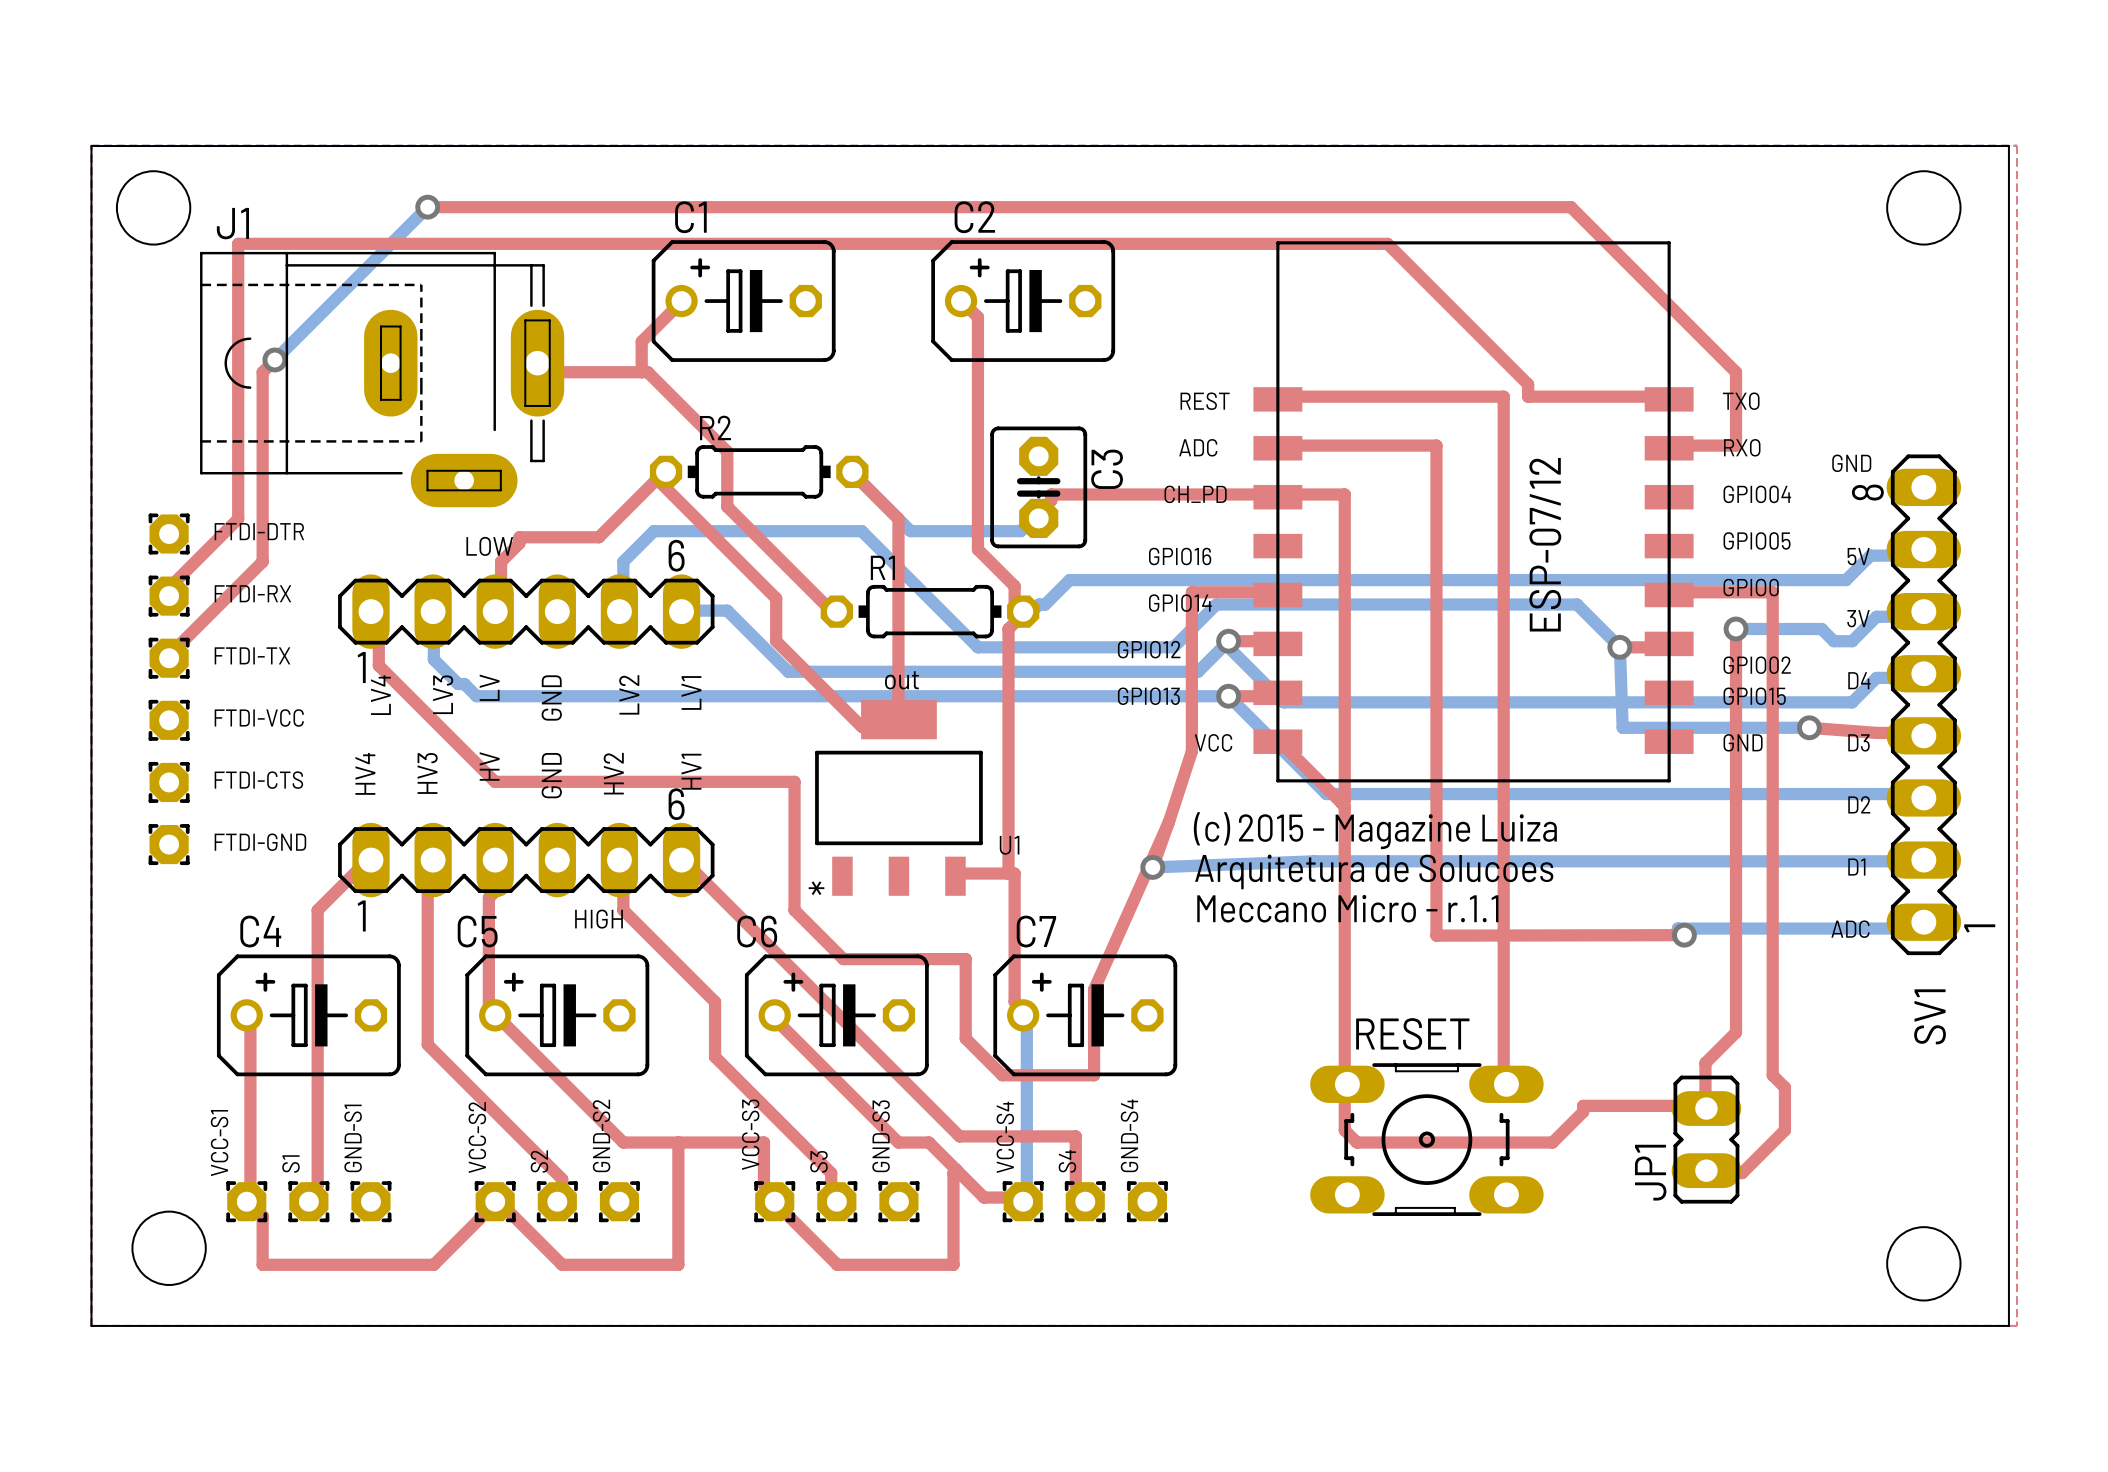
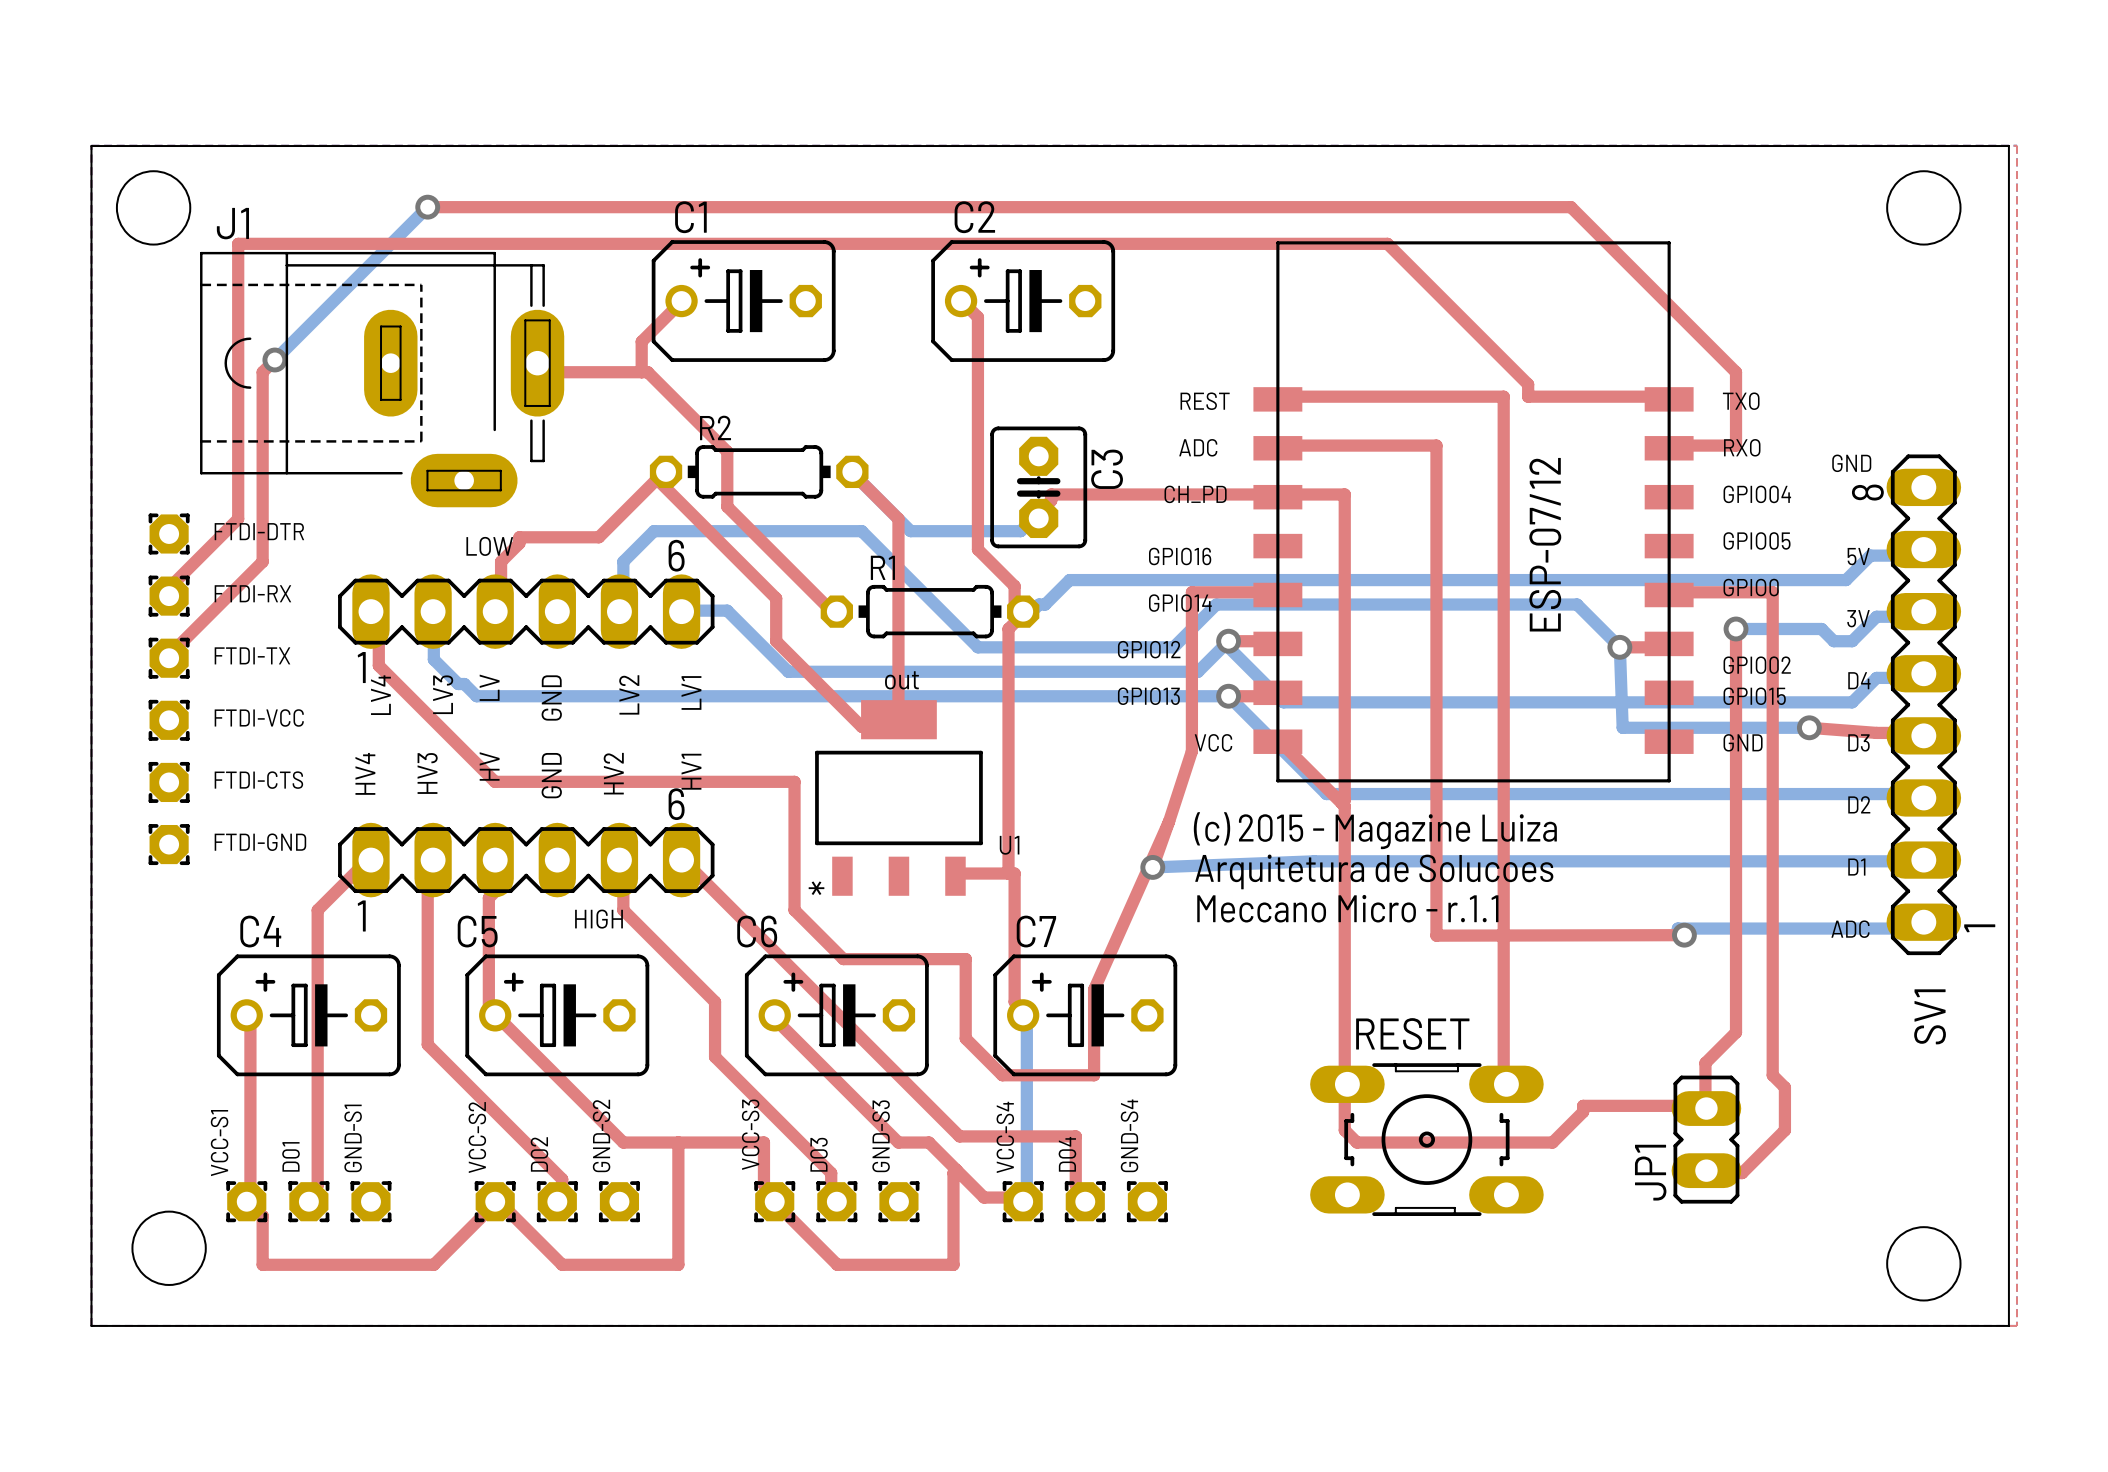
S2 name: S2 (539, 1161) -> D02 (539, 1154)
S3 name: S3 (818, 1161) -> D03 (818, 1154)
S4 name: S4 (1067, 1161) -> D04 (1067, 1154)
S1 name: S1 (290, 1163) -> D01 (291, 1156)

